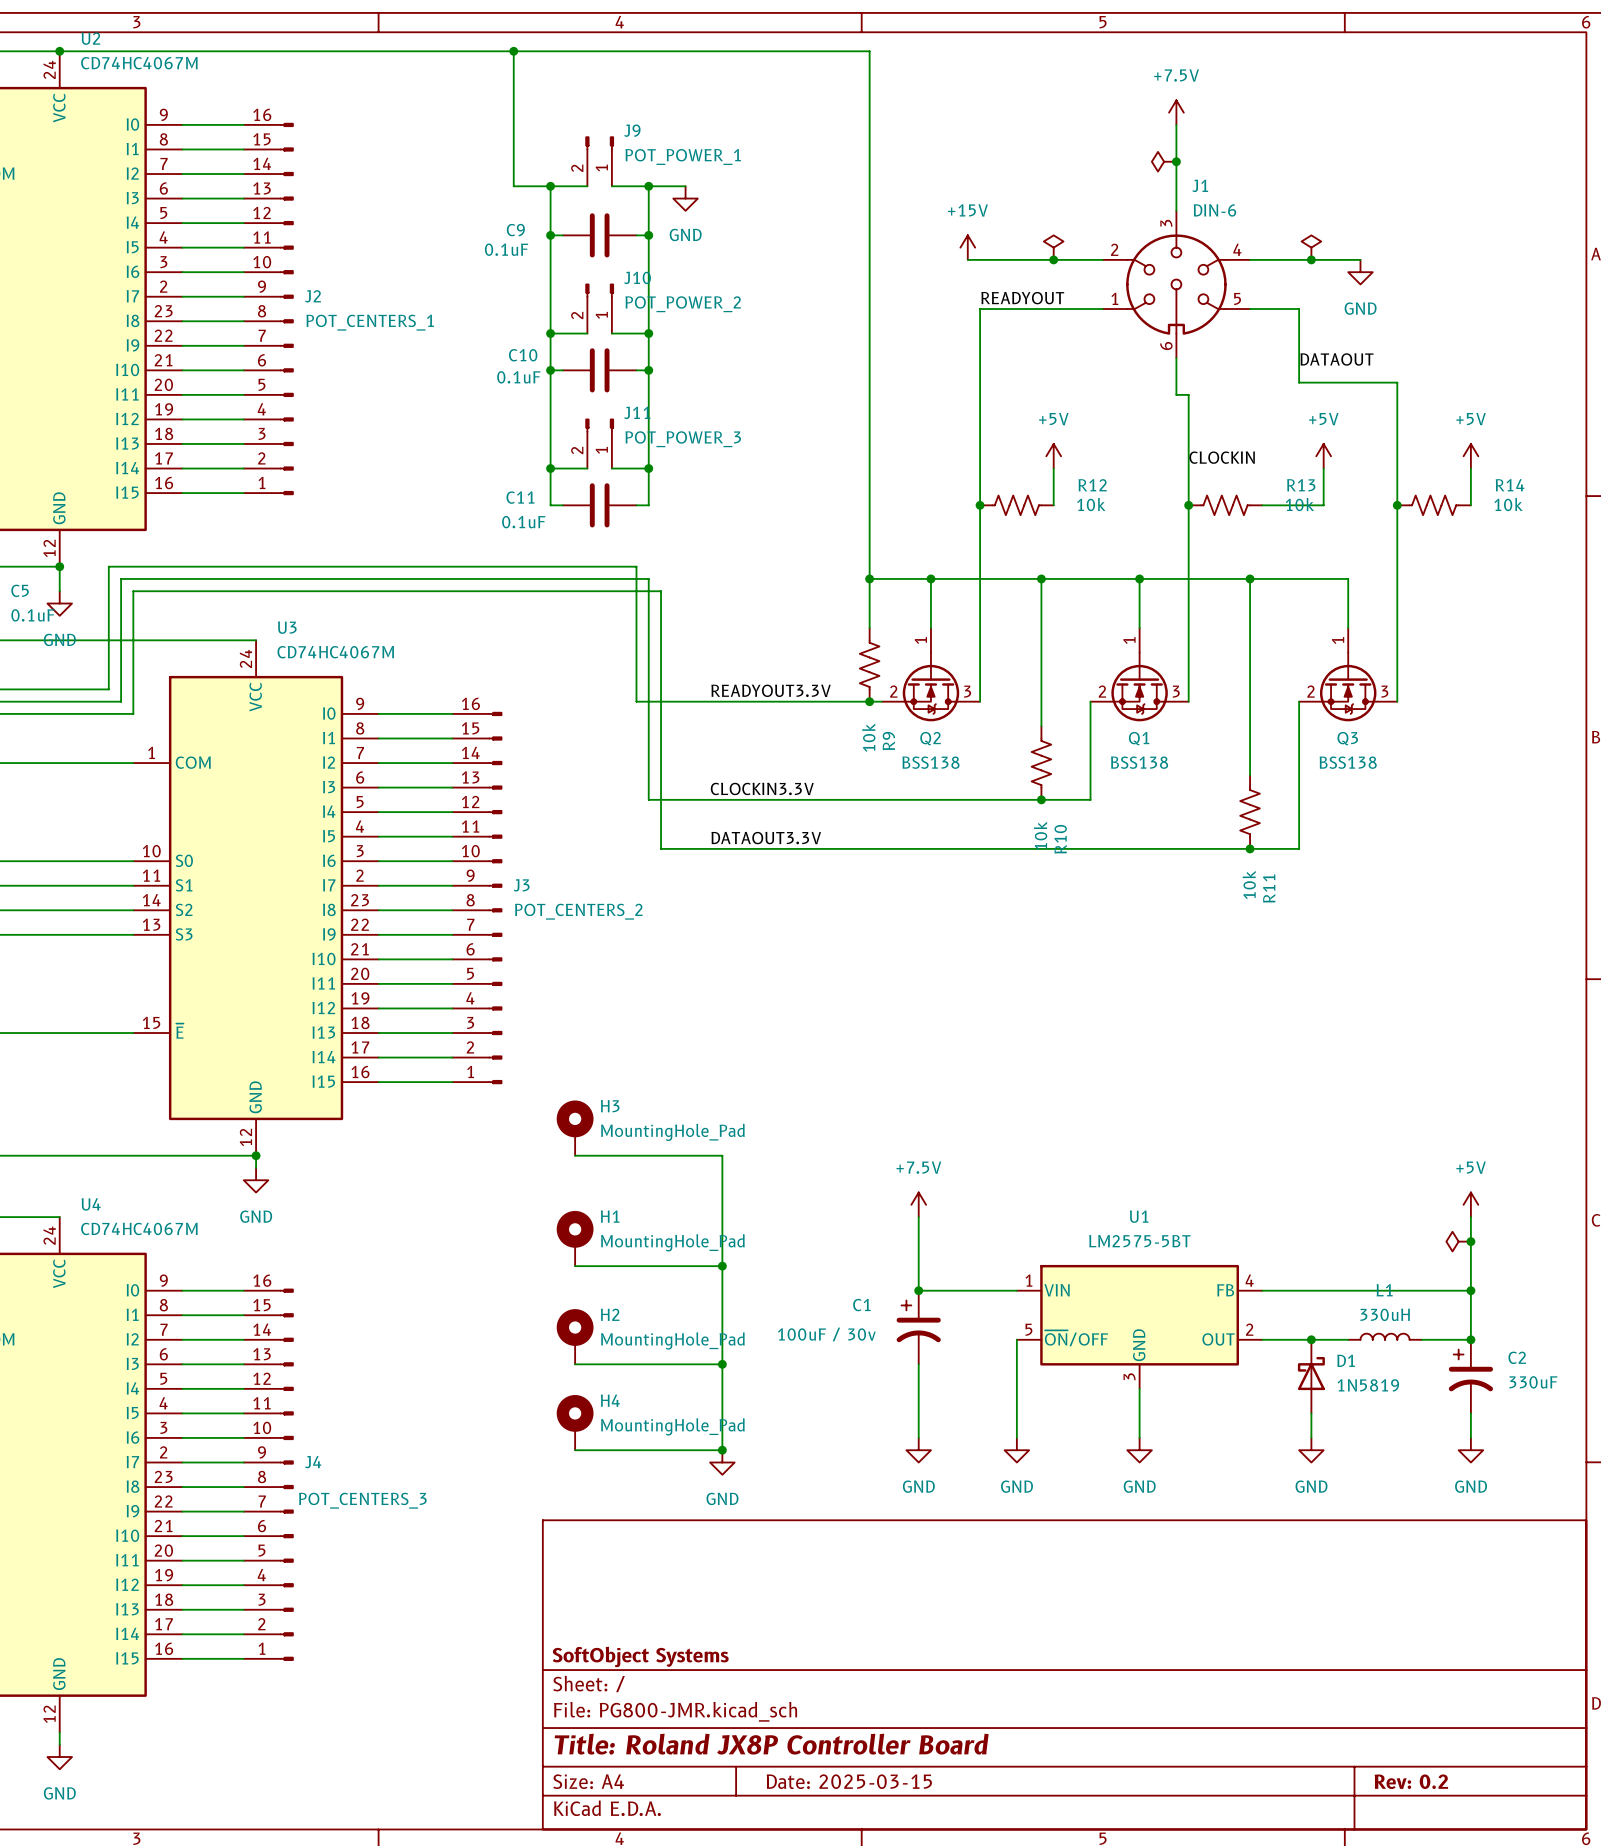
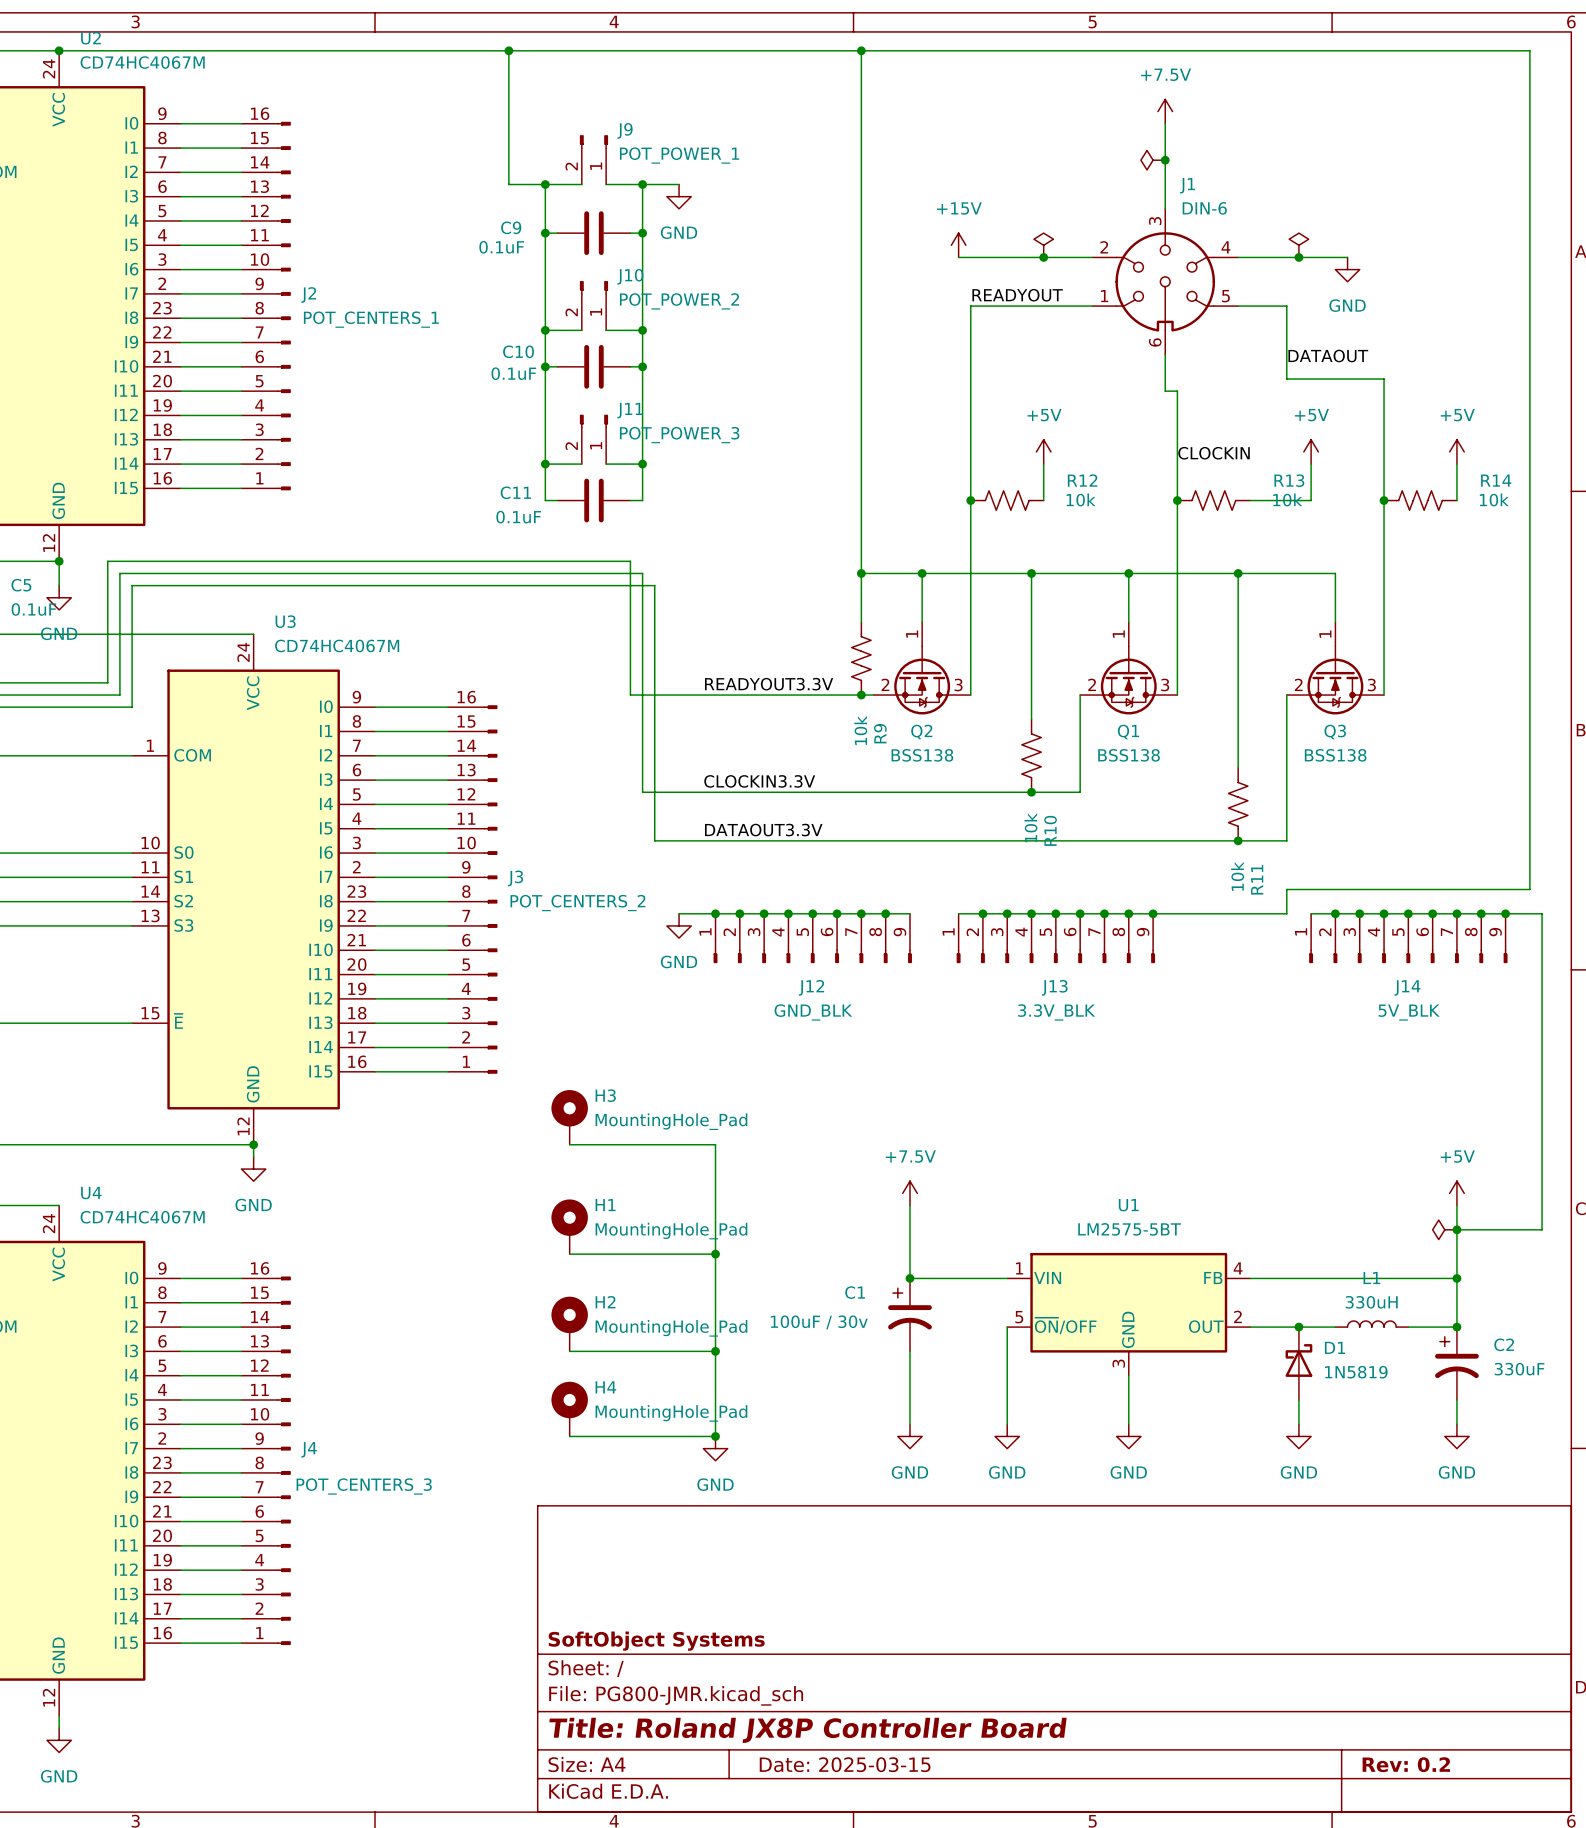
wire: none -> (861, 50) (1529, 50) (1529, 889) (1286, 889) (1286, 913) (958, 913)
junction: none -> (861, 50)
wire: none -> (679, 913) (909, 913)
junction: none -> (715, 913)
junction: none -> (739, 913)
junction: none -> (764, 913)
junction: none -> (788, 913)
junction: none -> (812, 913)
junction: none -> (837, 913)
junction: none -> (861, 913)
junction: none -> (885, 913)
junction: none -> (982, 913)
junction: none -> (1007, 913)
junction: none -> (1031, 913)
junction: none -> (1055, 913)
junction: none -> (1080, 913)
junction: none -> (1104, 913)
junction: none -> (1128, 913)
junction: none -> (1153, 913)
wire: none -> (1311, 913) (1542, 913) (1542, 1229) (1456, 1229)
junction: none -> (1335, 913)
junction: none -> (1359, 913)
junction: none -> (1384, 913)
junction: none -> (1408, 913)
junction: none -> (1432, 913)
junction: none -> (1456, 913)
junction: none -> (1481, 913)
junction: none -> (1505, 913)
power symbol: none -> GND (679, 925)
J12: none -> GND_BLK (812, 938)
J13: none -> 3.3V_BLK (1055, 938)
J14: none -> 5V_BLK (1408, 938)

